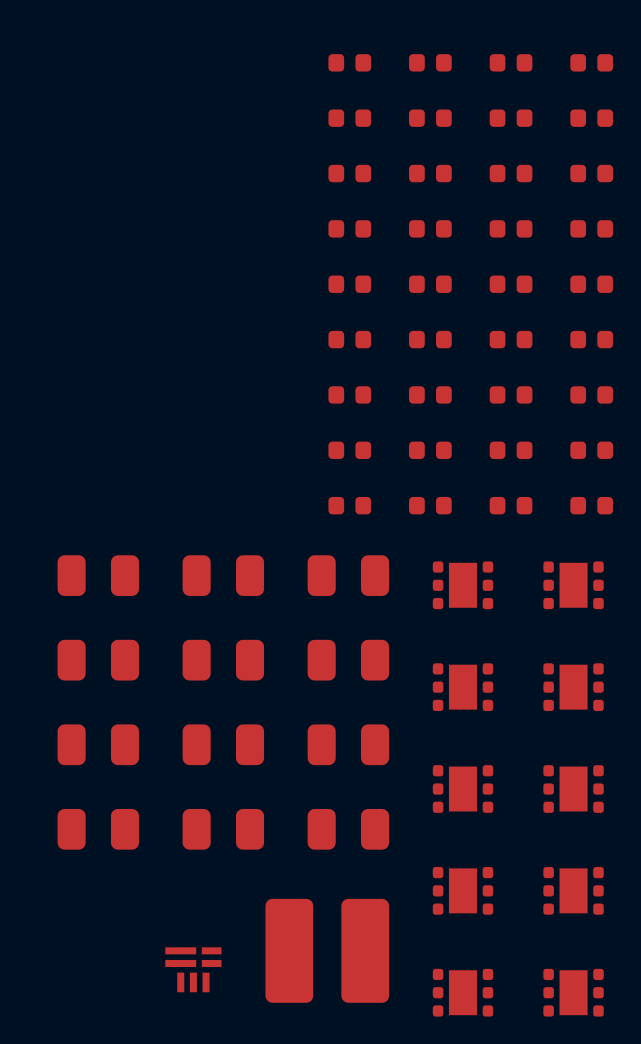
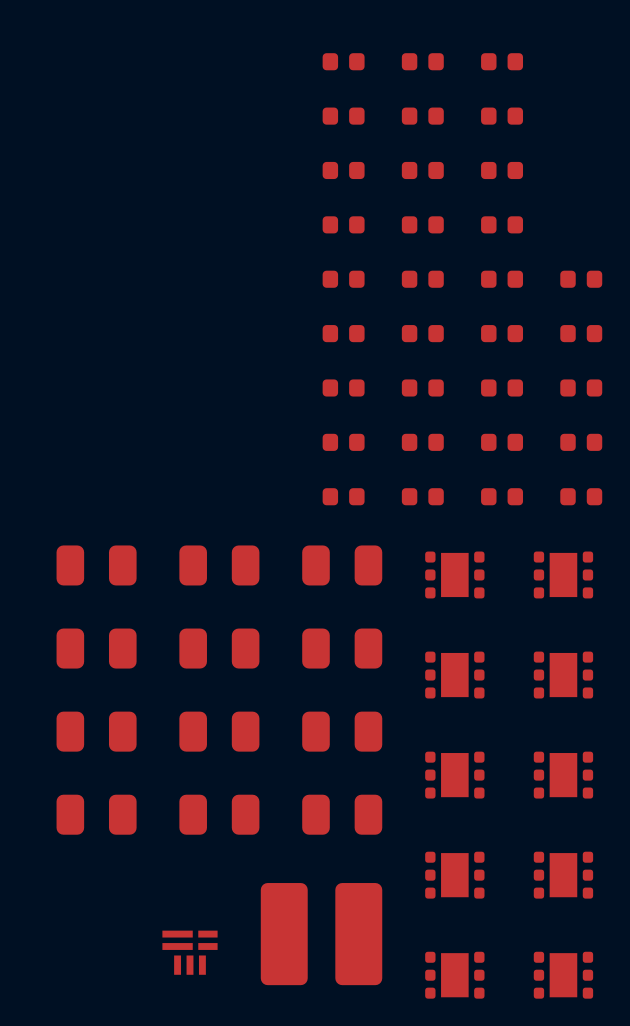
part: (591, 62) -> none
part: (591, 118) -> none
part: (591, 173) -> none
part: (591, 228) -> none

